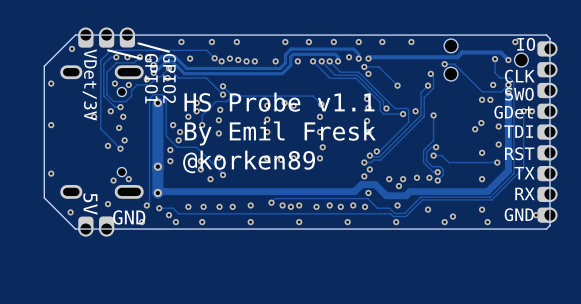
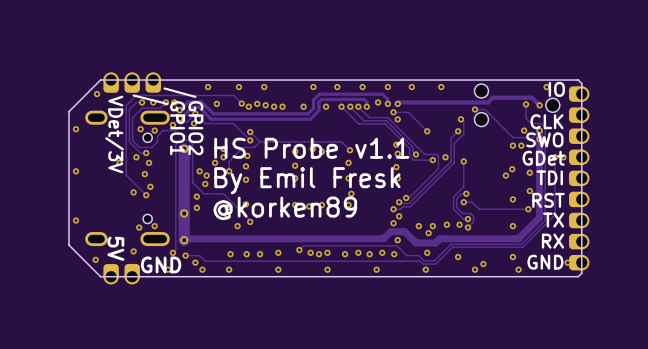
via: none -> (206, 175)
via: (180, 132) -> none
via: none -> (205, 183)
via: (178, 140) -> none
via: (188, 206) -> none

